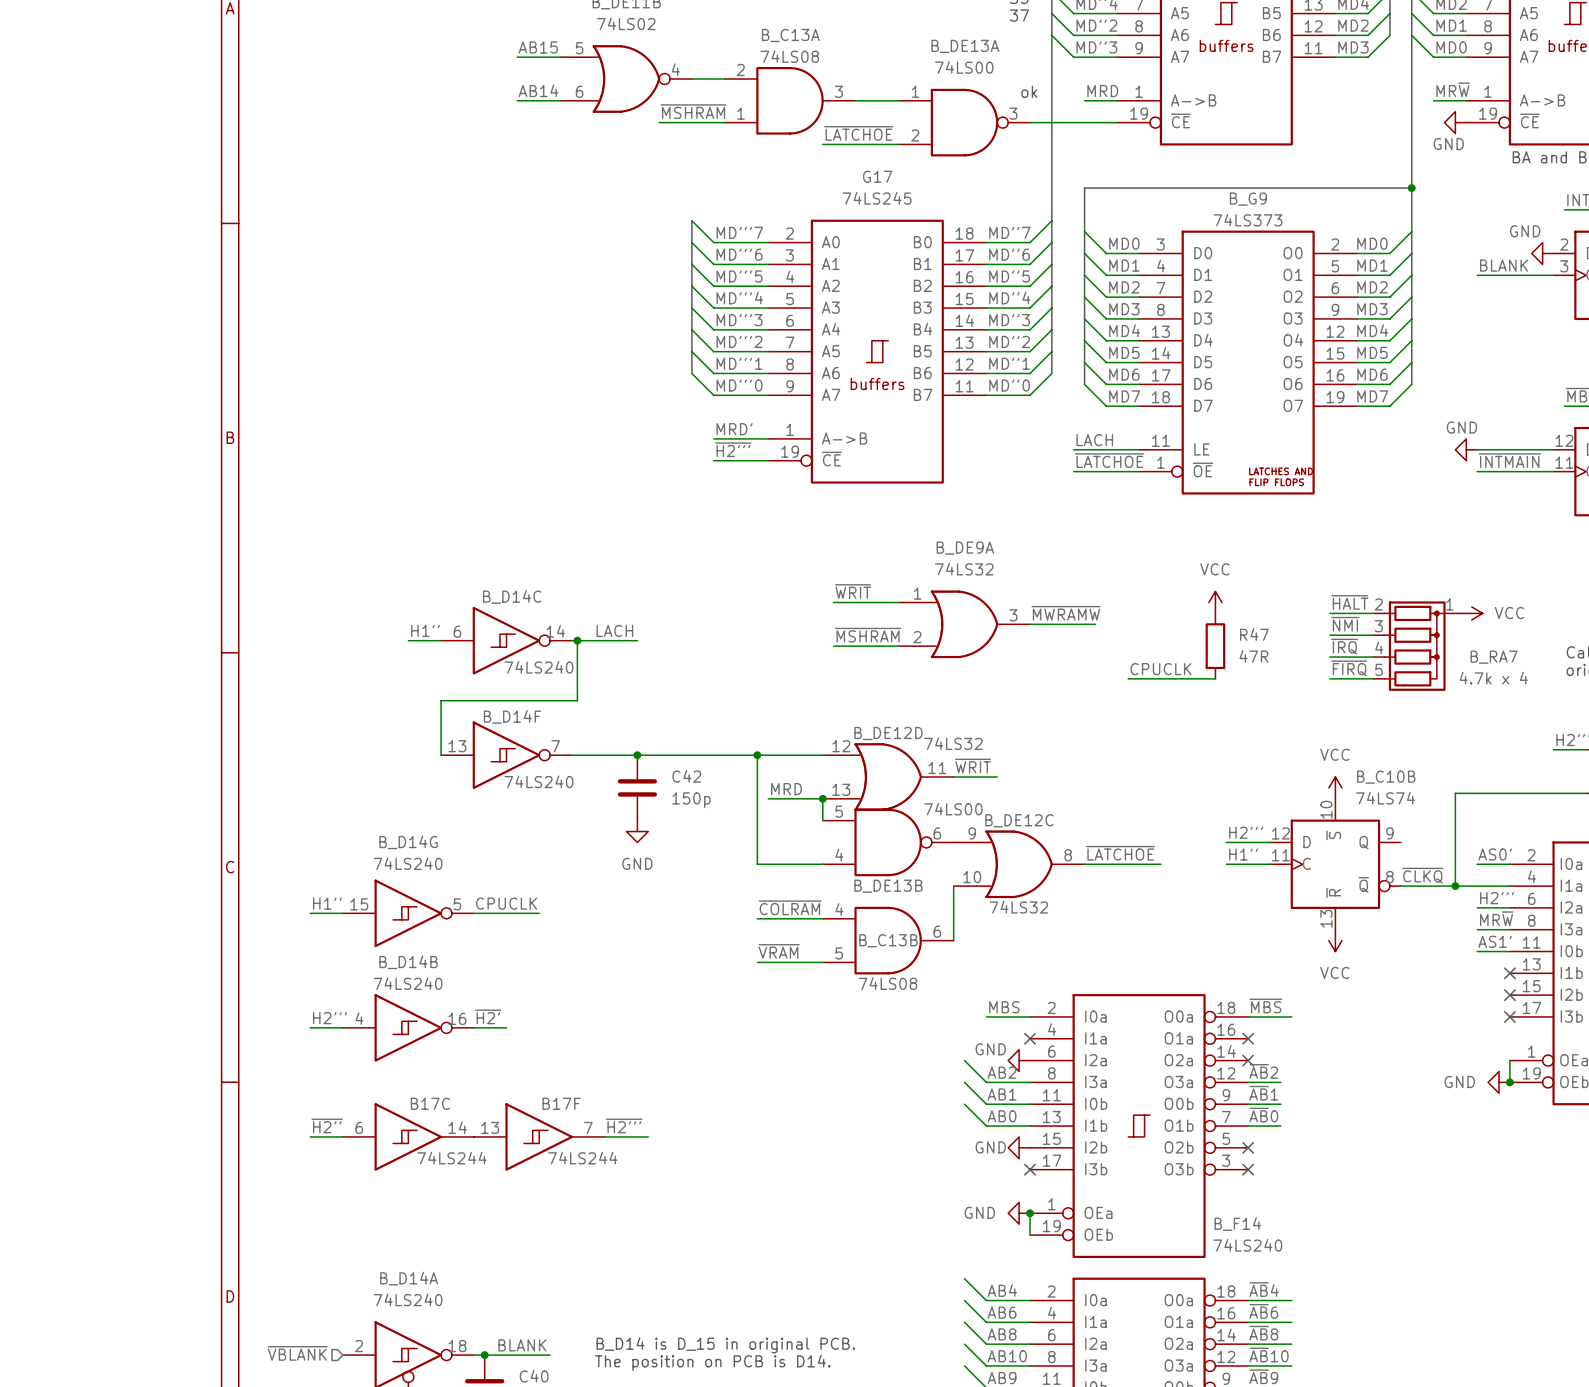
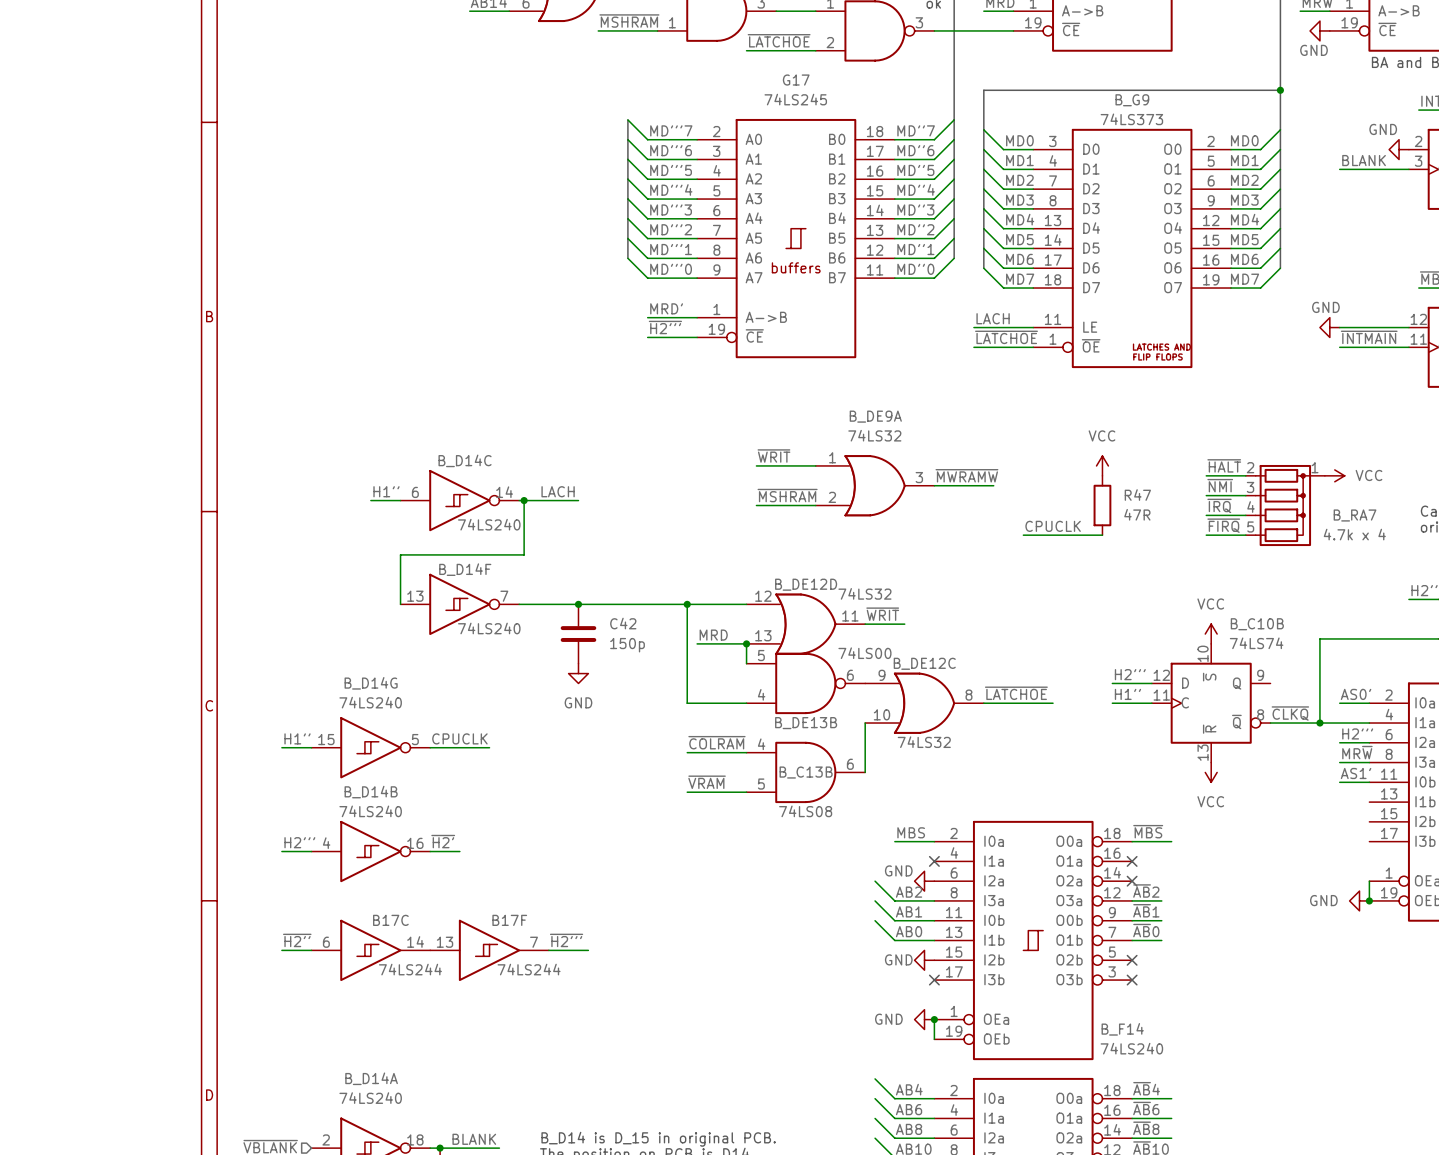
no-connect mark: (1509, 973) -> none
no-connect mark: (1509, 995) -> none
no-connect mark: (1509, 1016) -> none

